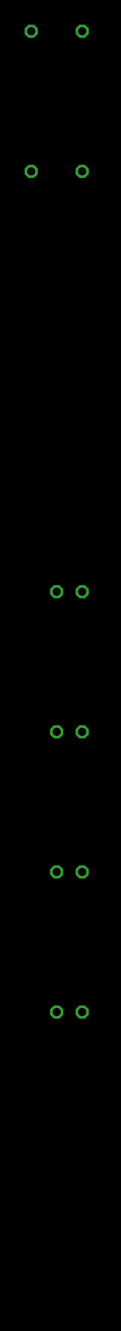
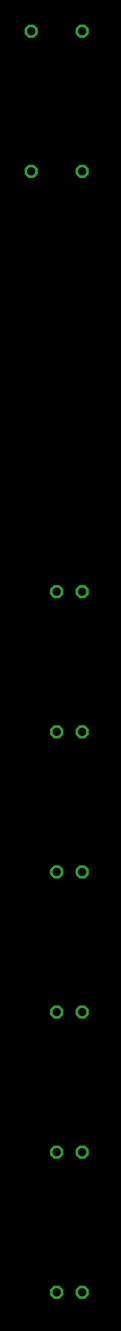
part: none -> (69, 1152)
part: none -> (69, 1292)

